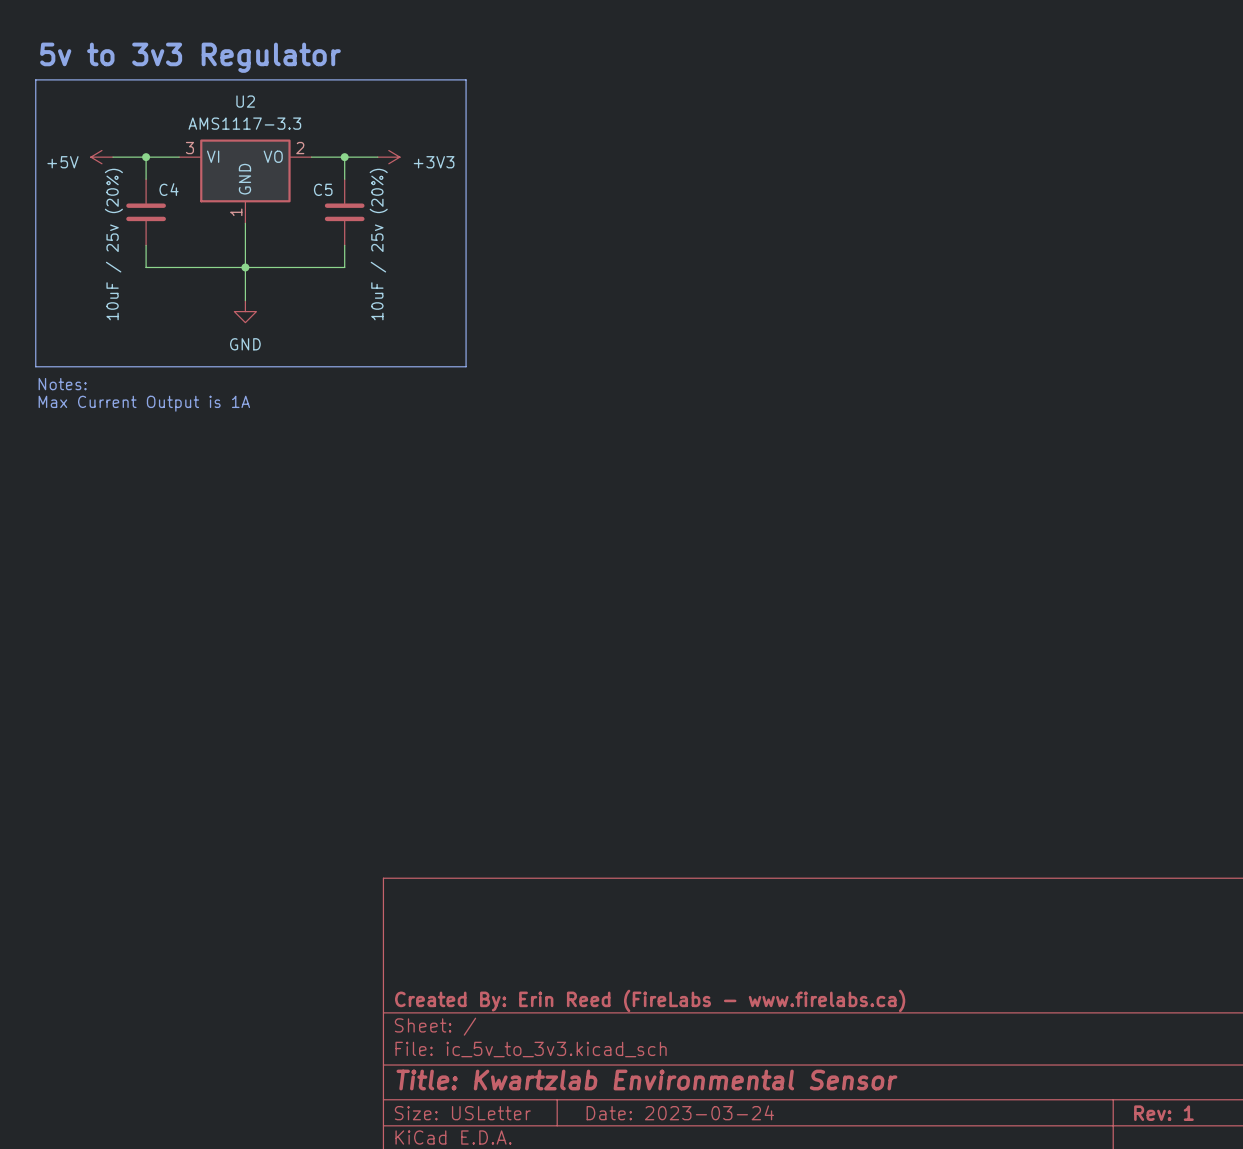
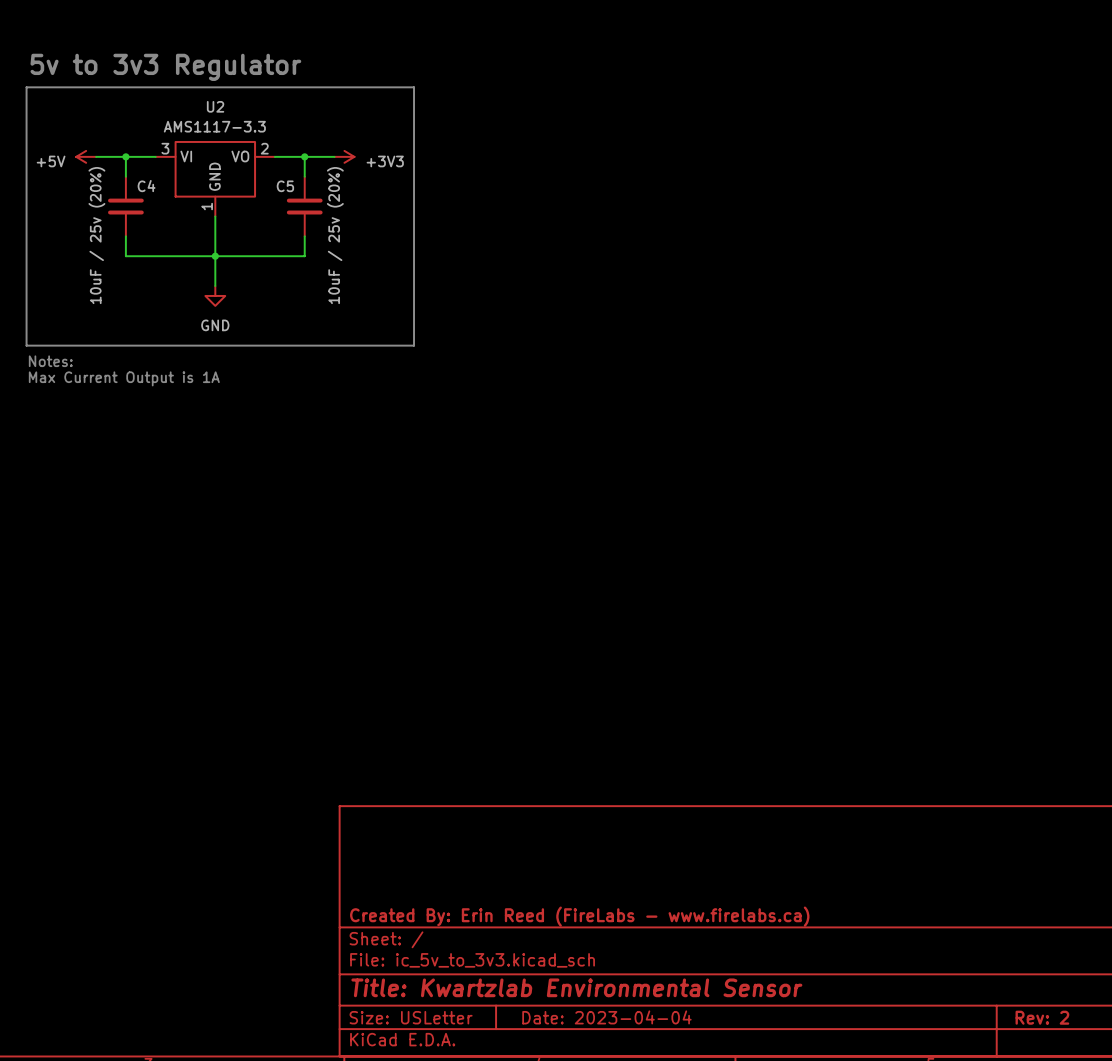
title block: Date: 2023-03-24 (680, 1112) -> Date: 2023-04-04 (606, 1017)
title block: Rev: 1 (1163, 1113) -> Rev: 2 (1042, 1017)

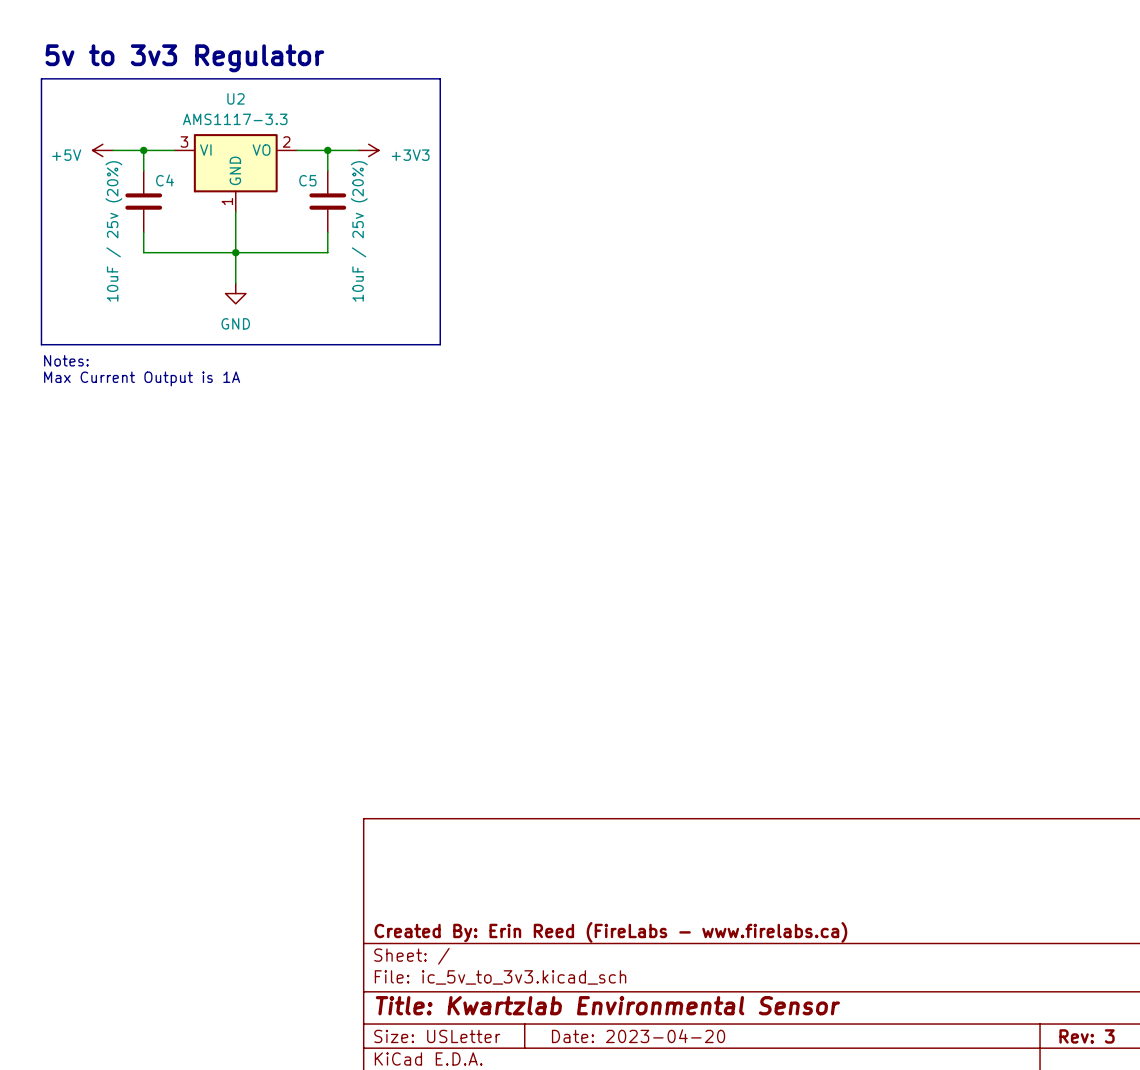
title block: Date: 2023-04-04 (606, 1017) -> Date: 2023-04-20 (638, 1036)
title block: Rev: 2 (1042, 1017) -> Rev: 3 (1087, 1036)

